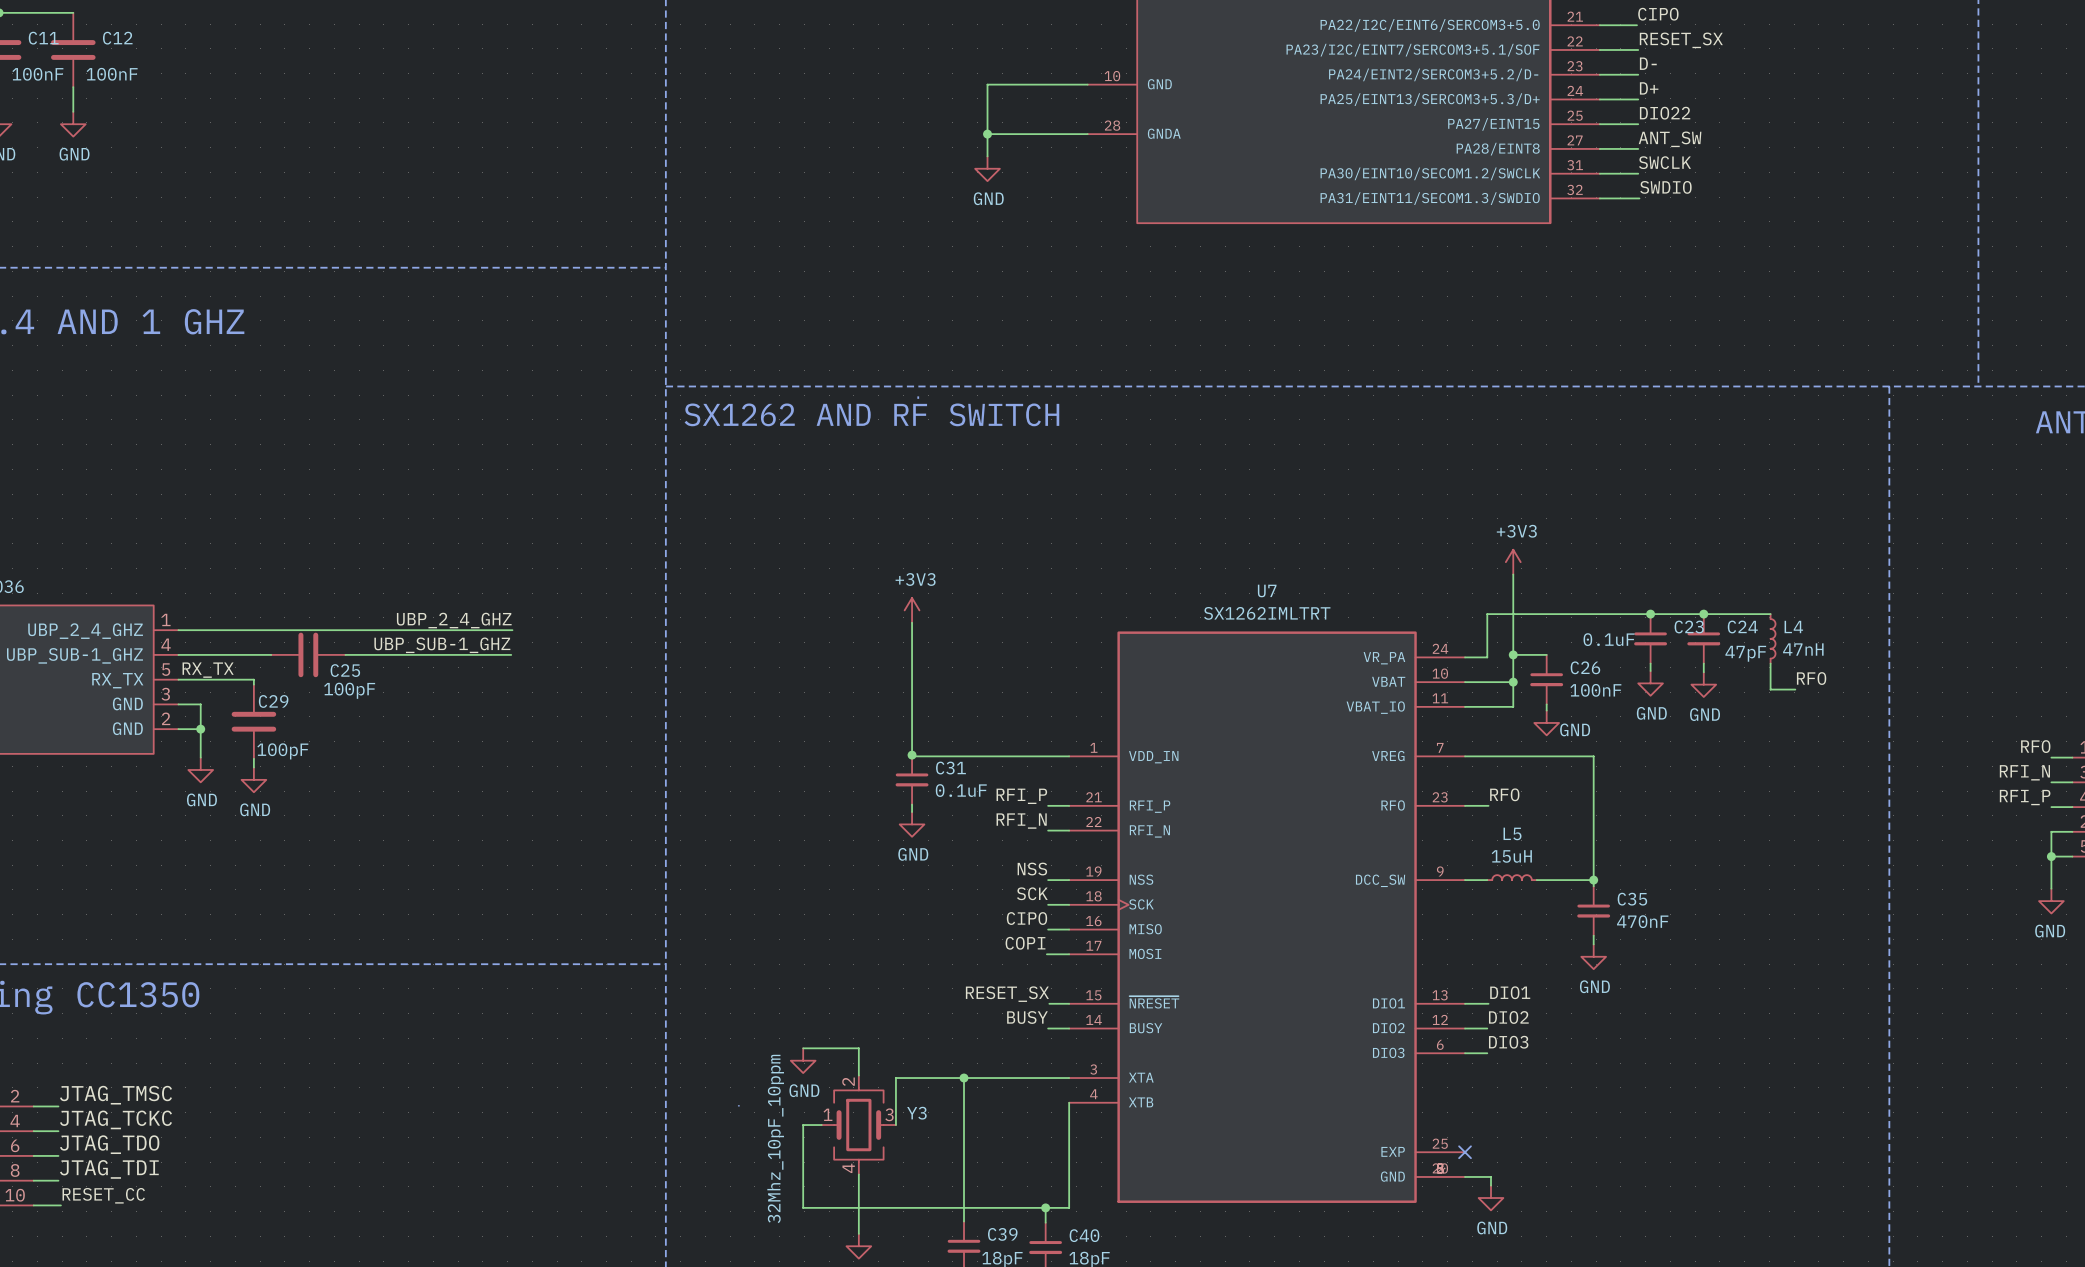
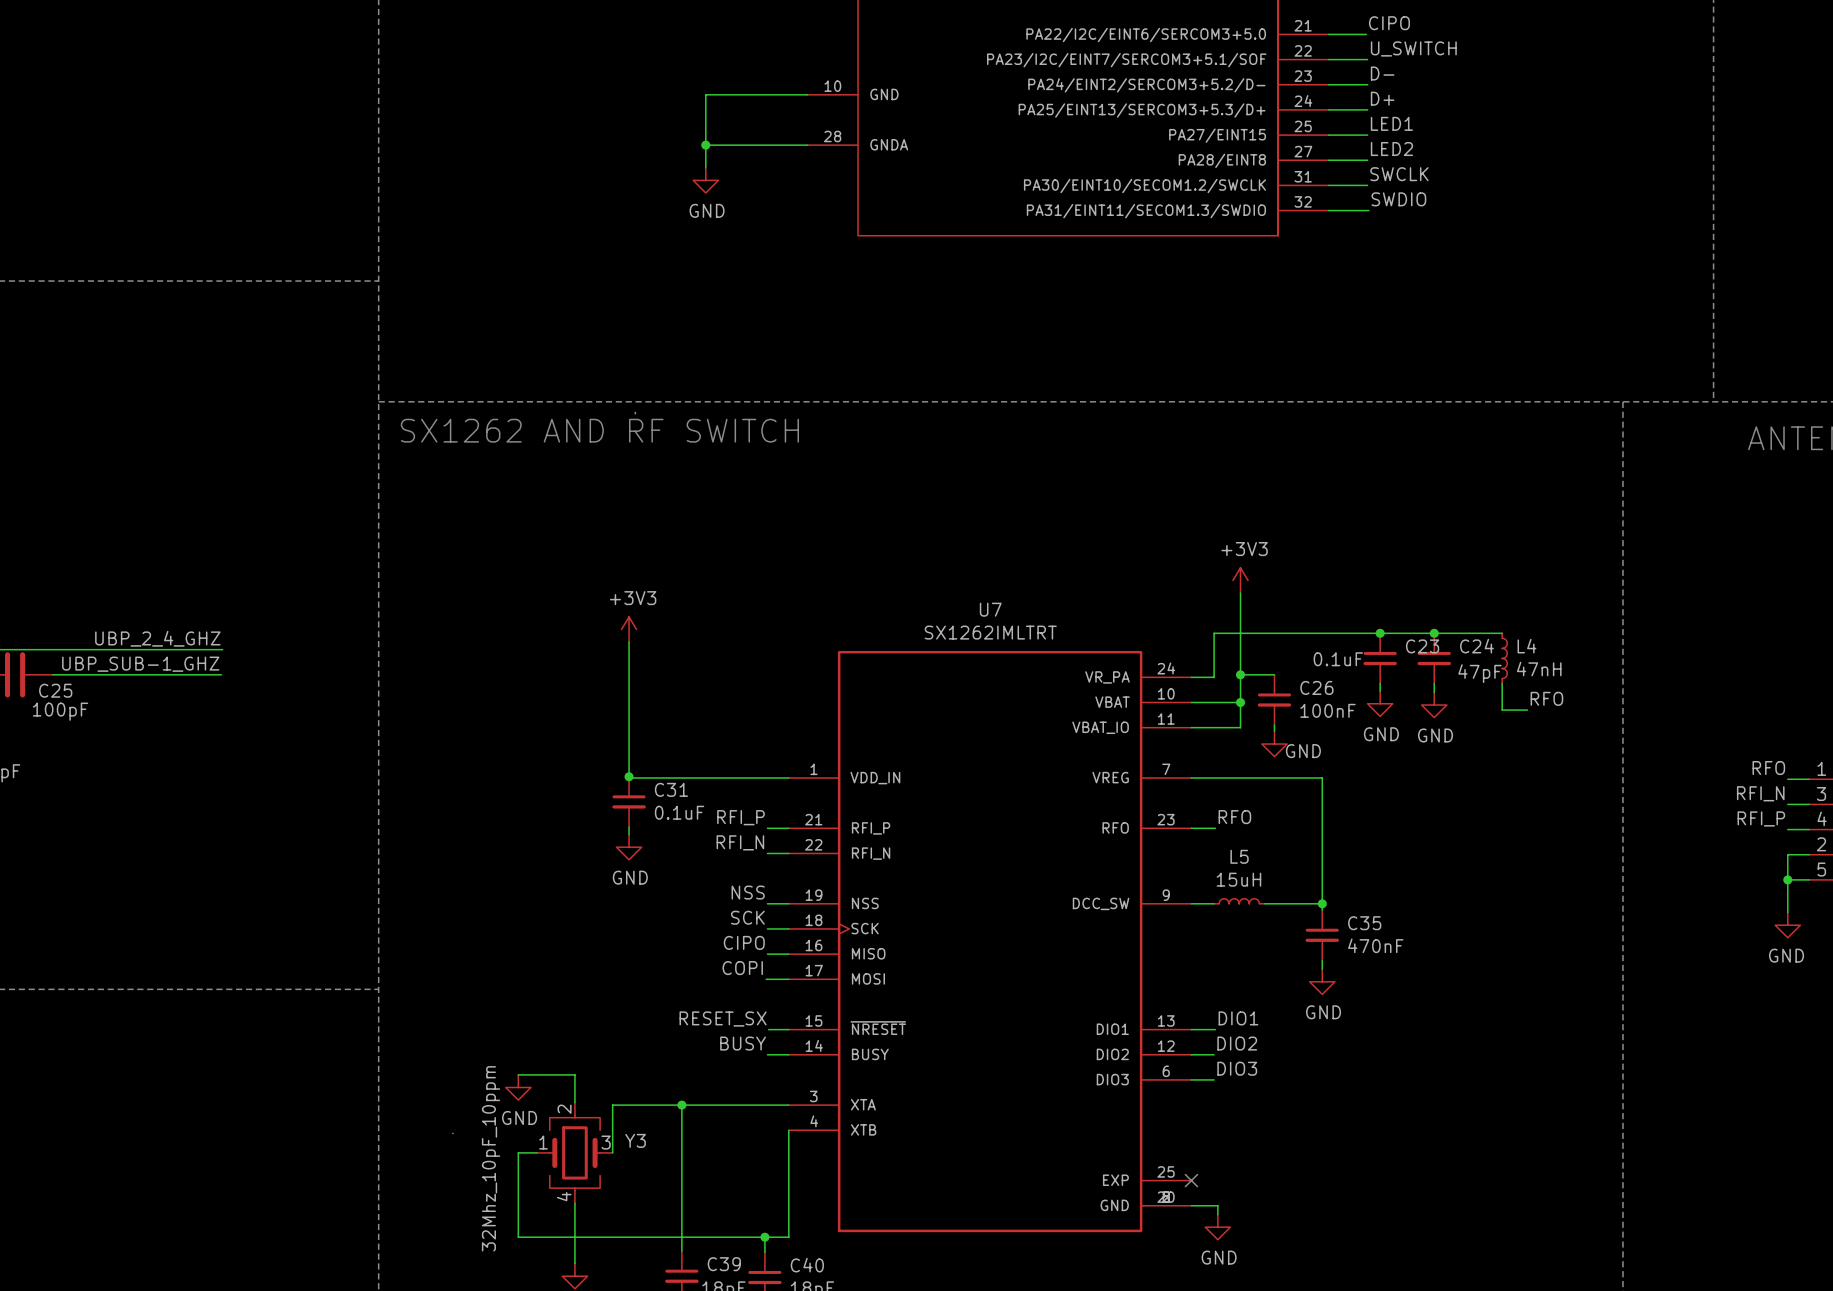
label: RESET_SX (1681, 40) -> U_SWITCH (1413, 48)
label: DIO22 (1665, 113) -> LED1 (1391, 123)
label: ANT_SW (1670, 139) -> LED2 (1391, 149)

